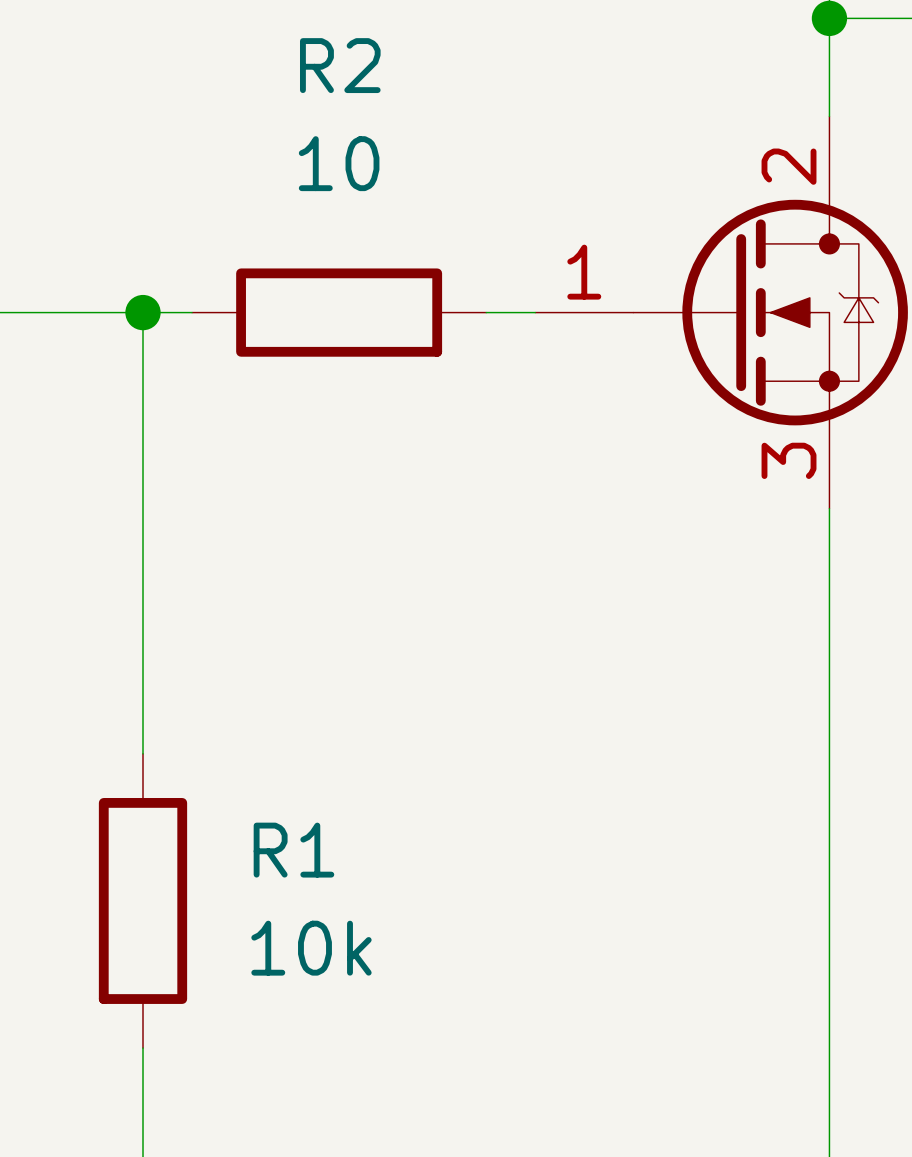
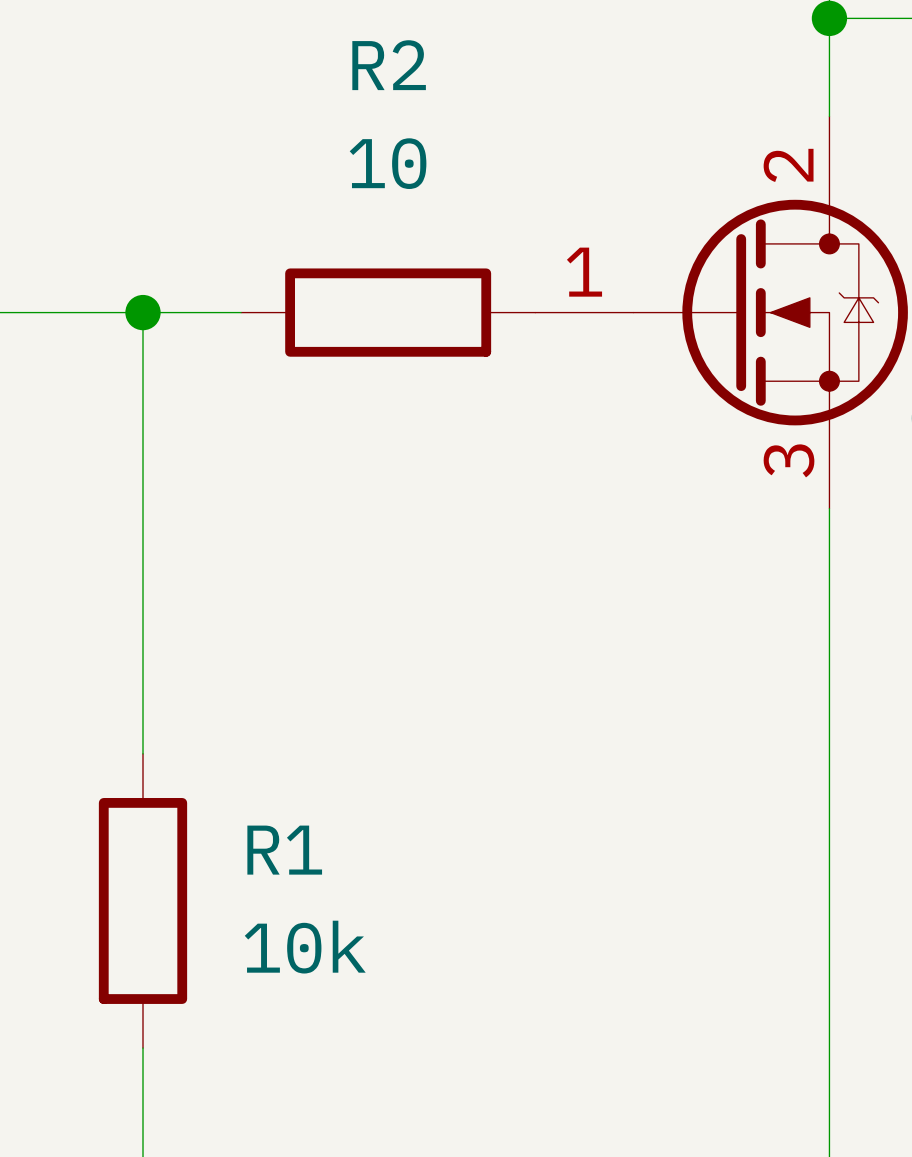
R2 position: (339, 312) -> (388, 312)

